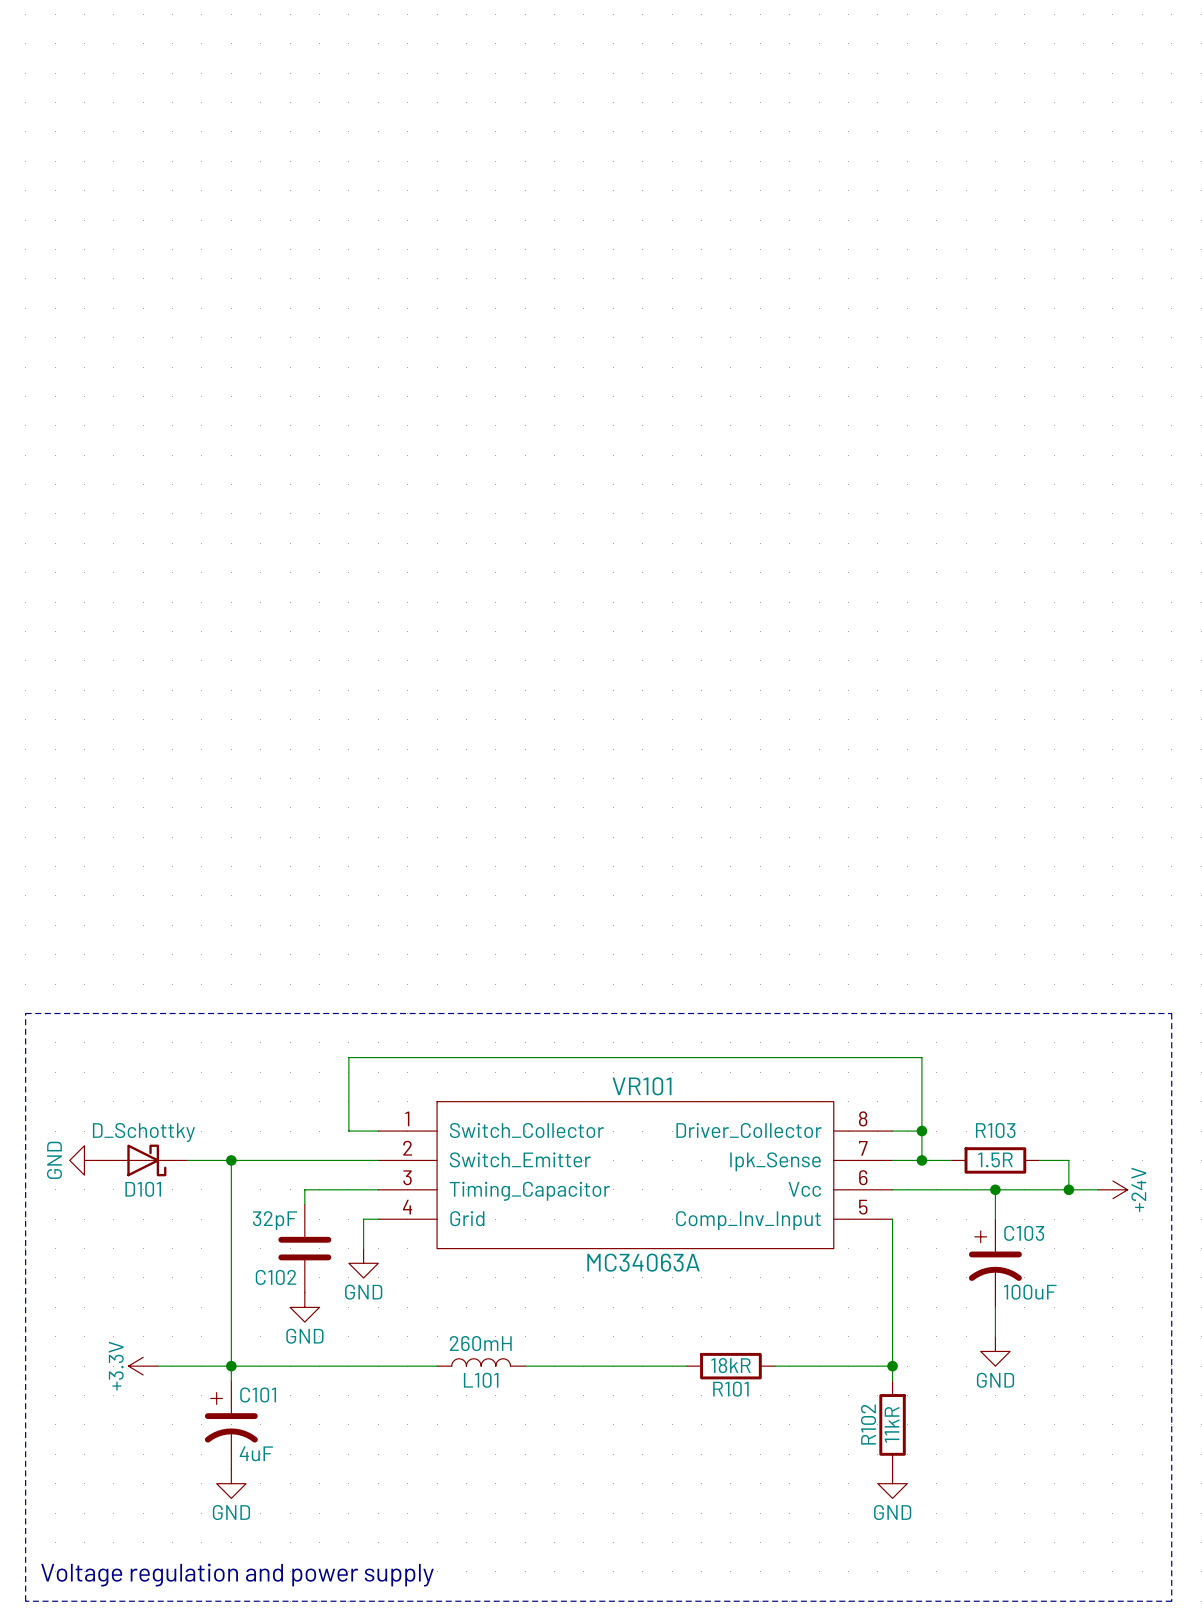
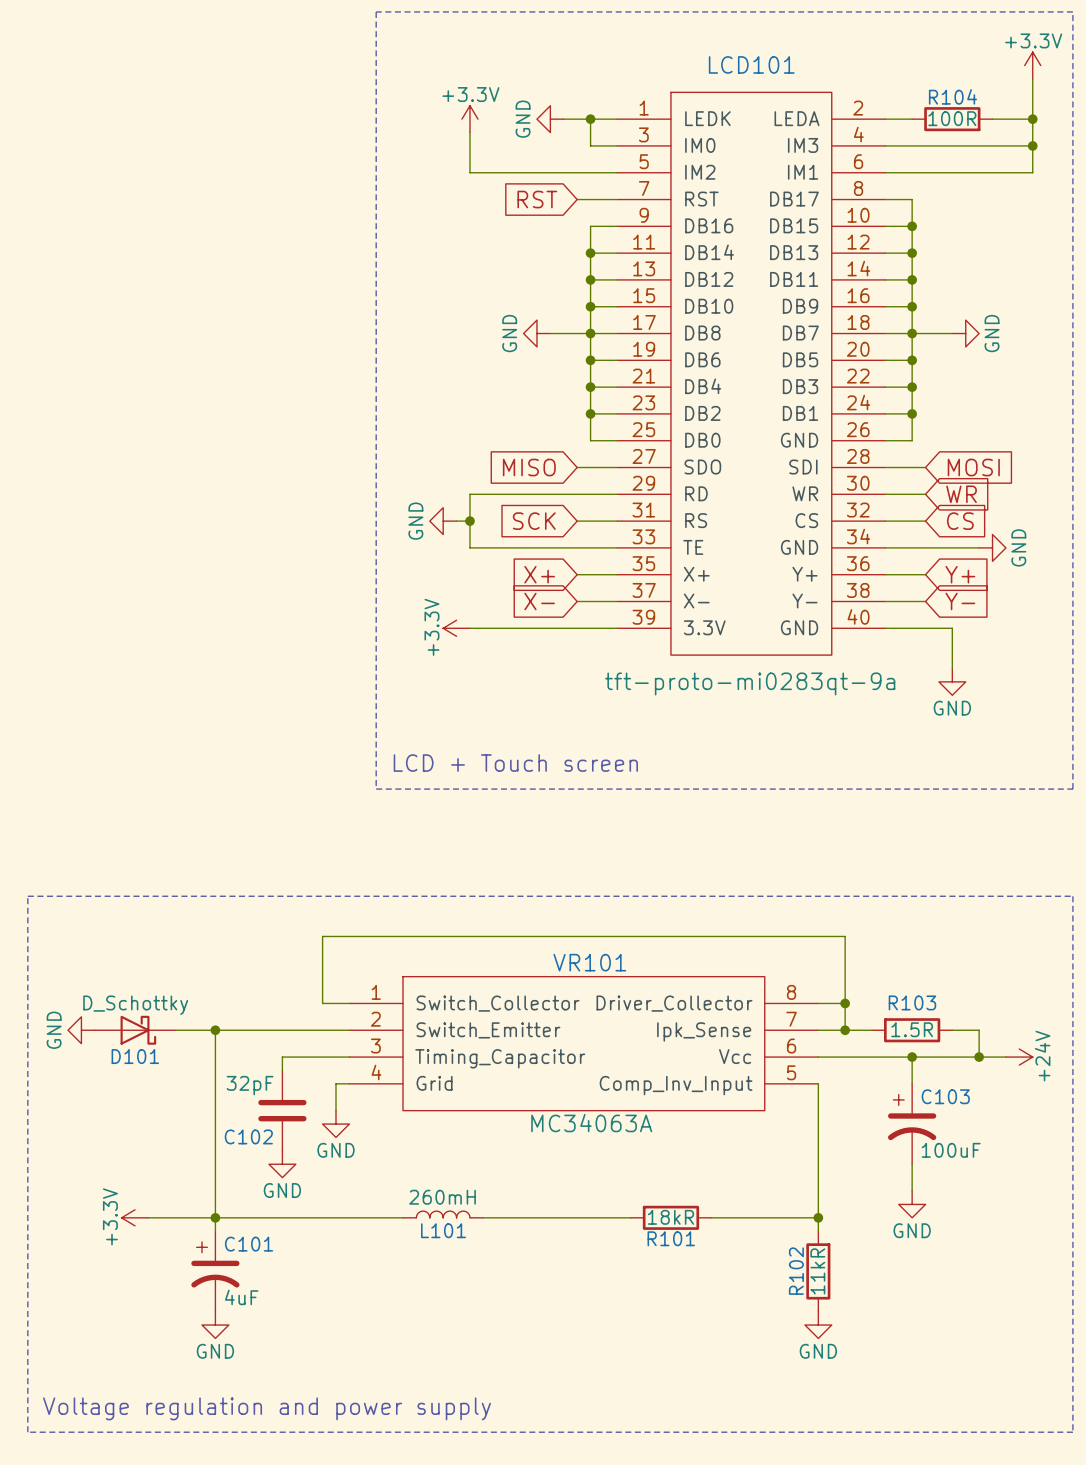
line: none -> (376, 11) (1072, 11) (1072, 789) (376, 789) (376, 11)
power symbol: none -> +3.3V (1032, 65)
wire: none -> (1032, 78) (1032, 172) (885, 172)
power symbol: none -> +3.3V (469, 119)
power symbol: none -> GND (550, 119)
wire: none -> (563, 119) (617, 119)
wire: none -> (590, 119) (590, 145) (617, 145)
junction: none -> (590, 119)
wire: none -> (885, 119) (912, 119)
R104: none -> 100R (952, 119)
wire: none -> (992, 119) (1032, 119)
junction: none -> (1032, 119)
wire: none -> (469, 132) (469, 172) (617, 172)
wire: none -> (885, 145) (1032, 145)
junction: none -> (1032, 145)
global label: none -> RST (537, 199)
wire: none -> (577, 199) (617, 199)
wire: none -> (885, 199) (912, 199) (912, 440) (885, 440)
wire: none -> (617, 226) (590, 226) (590, 440) (617, 440)
wire: none -> (885, 226) (912, 226)
junction: none -> (912, 226)
wire: none -> (590, 253) (617, 253)
junction: none -> (590, 253)
wire: none -> (885, 253) (912, 253)
junction: none -> (912, 253)
wire: none -> (590, 279) (617, 279)
junction: none -> (590, 279)
wire: none -> (885, 279) (912, 279)
junction: none -> (912, 279)
wire: none -> (590, 306) (617, 306)
junction: none -> (590, 306)
wire: none -> (885, 306) (912, 306)
junction: none -> (912, 306)
power symbol: none -> GND (536, 333)
wire: none -> (550, 333) (617, 333)
junction: none -> (590, 333)
wire: none -> (885, 333) (952, 333)
junction: none -> (912, 333)
power symbol: none -> GND (965, 333)
wire: none -> (590, 360) (617, 360)
junction: none -> (590, 360)
wire: none -> (885, 360) (912, 360)
junction: none -> (912, 360)
LCD101: none -> tft-proto-mi0283qt-9a (751, 373)
wire: none -> (590, 387) (617, 387)
junction: none -> (590, 387)
wire: none -> (885, 387) (912, 387)
junction: none -> (912, 387)
wire: none -> (590, 413) (617, 413)
junction: none -> (590, 413)
wire: none -> (885, 413) (912, 413)
junction: none -> (912, 413)
global label: none -> MISO (529, 467)
wire: none -> (577, 467) (617, 467)
wire: none -> (885, 467) (925, 467)
global label: none -> MOSI (973, 467)
wire: none -> (617, 494) (469, 494) (469, 547) (617, 547)
wire: none -> (885, 494) (925, 494)
global label: none -> WR (961, 494)
power symbol: none -> GND (443, 521)
wire: none -> (456, 521) (469, 521)
junction: none -> (469, 521)
global label: none -> SCK (534, 521)
wire: none -> (577, 521) (617, 521)
wire: none -> (885, 521) (925, 521)
global label: none -> CS (960, 521)
wire: none -> (885, 547) (979, 547)
power symbol: none -> GND (992, 547)
global label: none -> X+ (539, 574)
wire: none -> (577, 574) (617, 574)
wire: none -> (885, 574) (925, 574)
global label: none -> Y+ (960, 574)
global label: none -> X- (539, 601)
wire: none -> (577, 601) (617, 601)
wire: none -> (885, 601) (925, 601)
global label: none -> Y- (960, 601)
power symbol: none -> +3.3V (456, 628)
wire: none -> (469, 628) (617, 628)
wire: none -> (885, 628) (952, 628) (952, 668)
power symbol: none -> GND (952, 681)
text: none -> LCD + Touch screen (515, 763)

